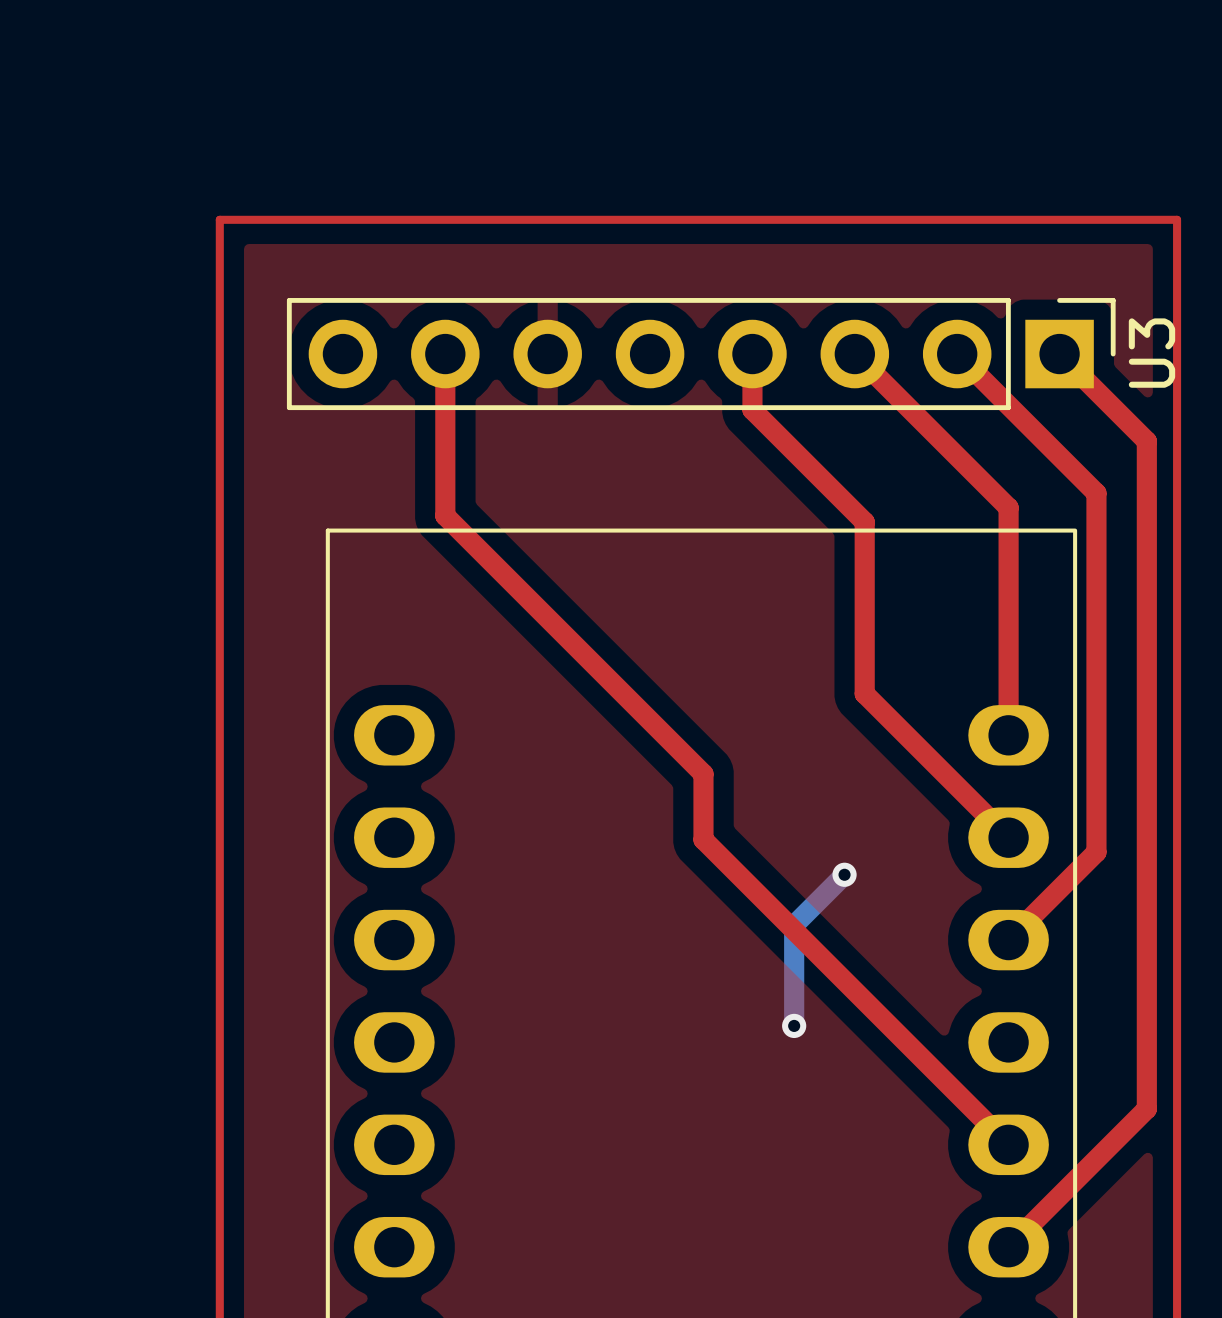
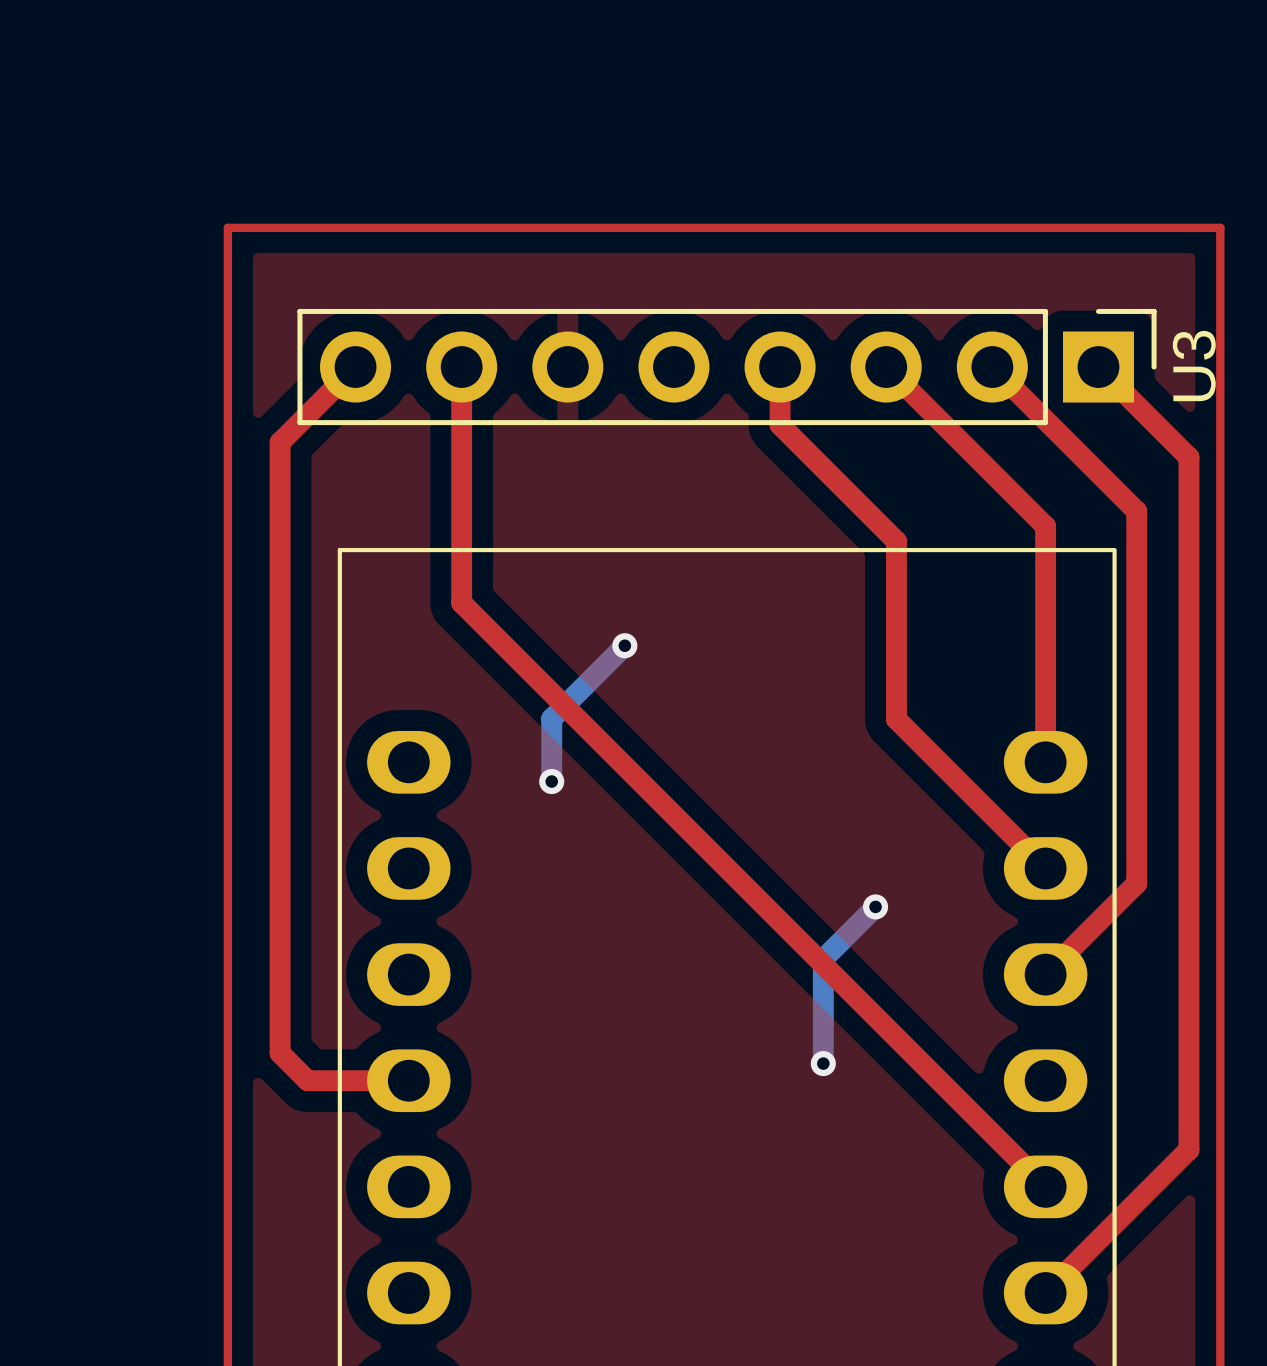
top track: none -> (355, 367) (280, 442) (280, 1053) (307, 1080) (408, 1080)
top track: (445, 515) (703, 774) (703, 839) -> (461, 534) (461, 602) (729, 870)
bottom track: none -> (624, 645) (551, 718) (551, 781)
via: none -> (624, 645)
via: none -> (551, 781)

